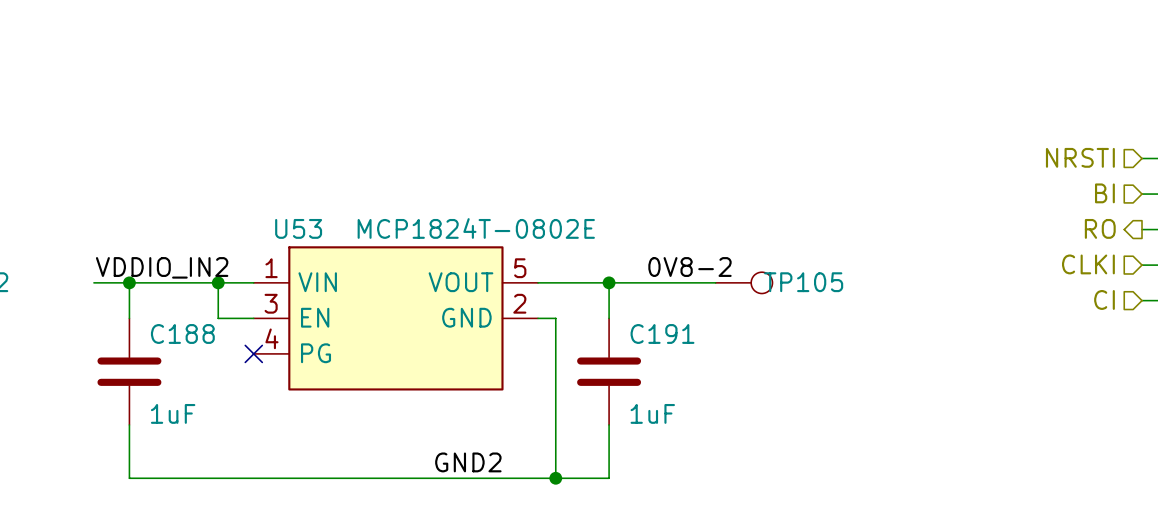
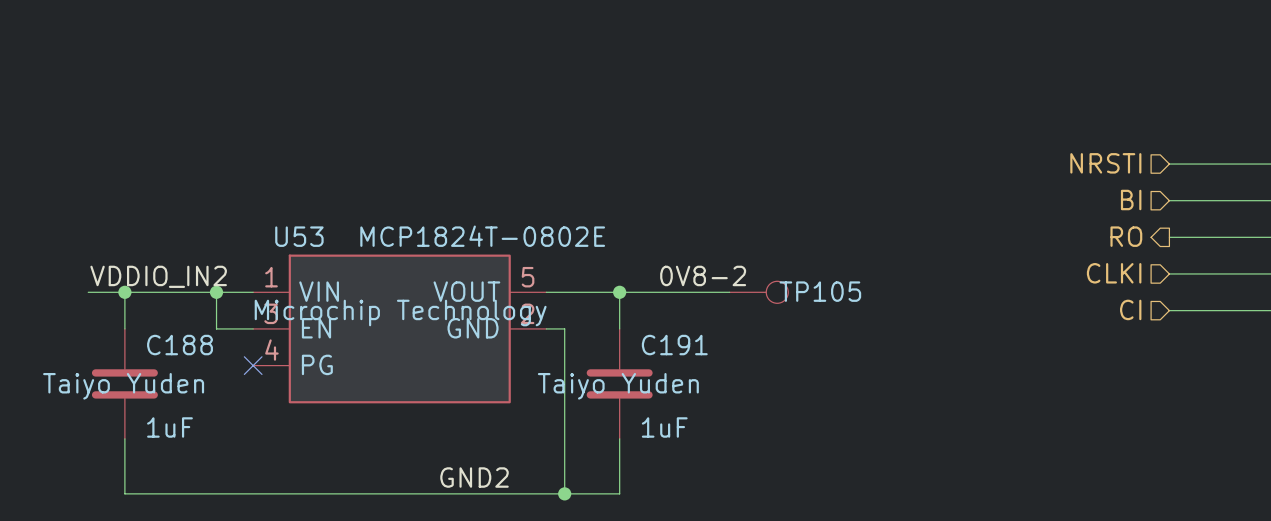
U53 text: none -> Microchip Technology (400, 313)
C188 text: none -> Taiyo Yuden (123, 386)
C191 text: none -> Taiyo Yuden (618, 386)

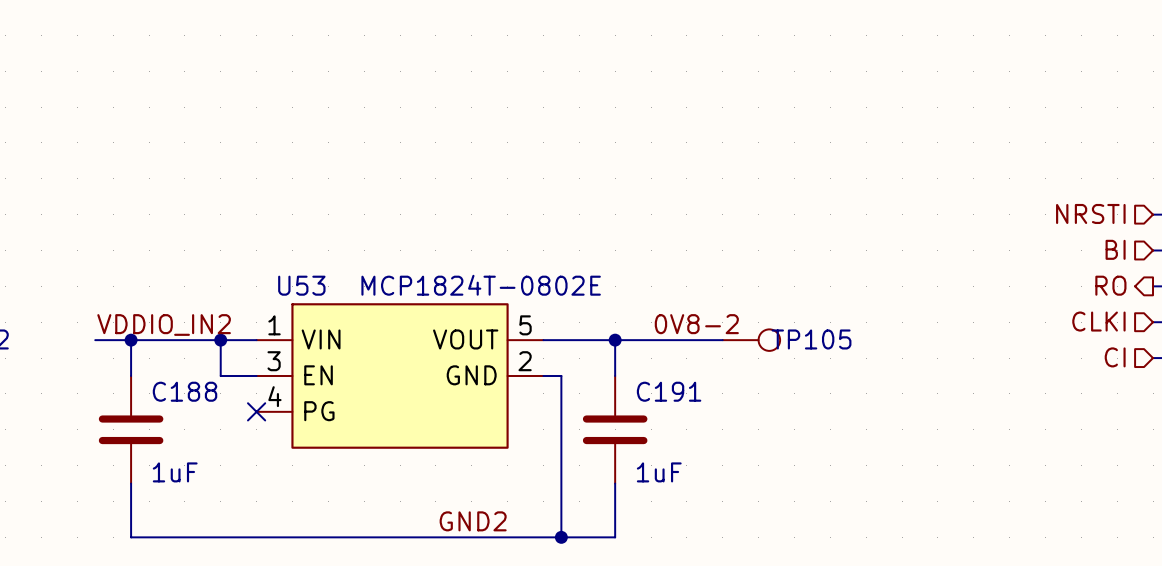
U53 text: Microchip Technology (400, 313) -> none
C188 text: Taiyo Yuden (123, 386) -> none
C191 text: Taiyo Yuden (618, 386) -> none

